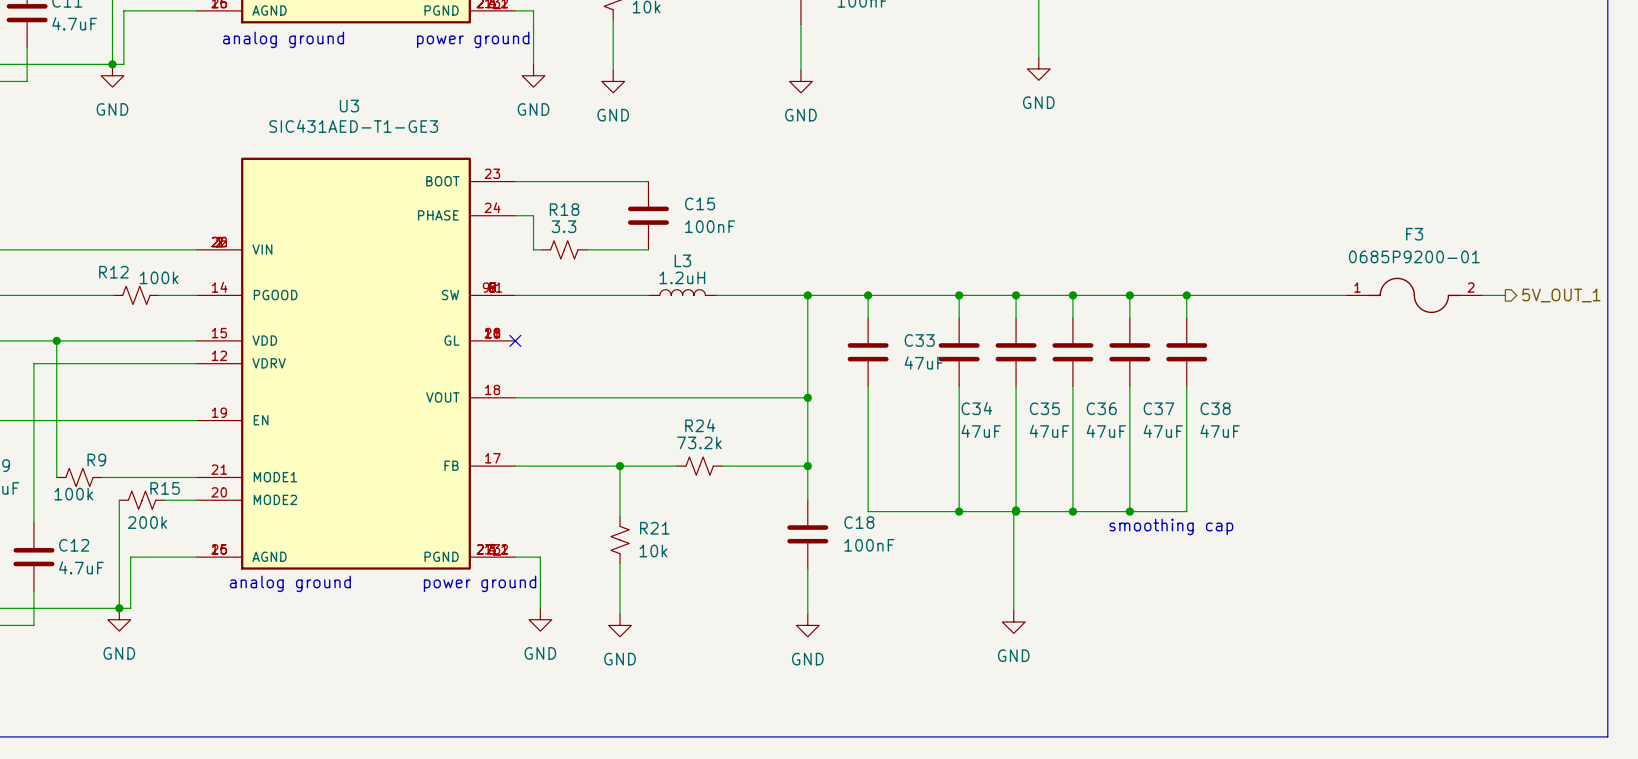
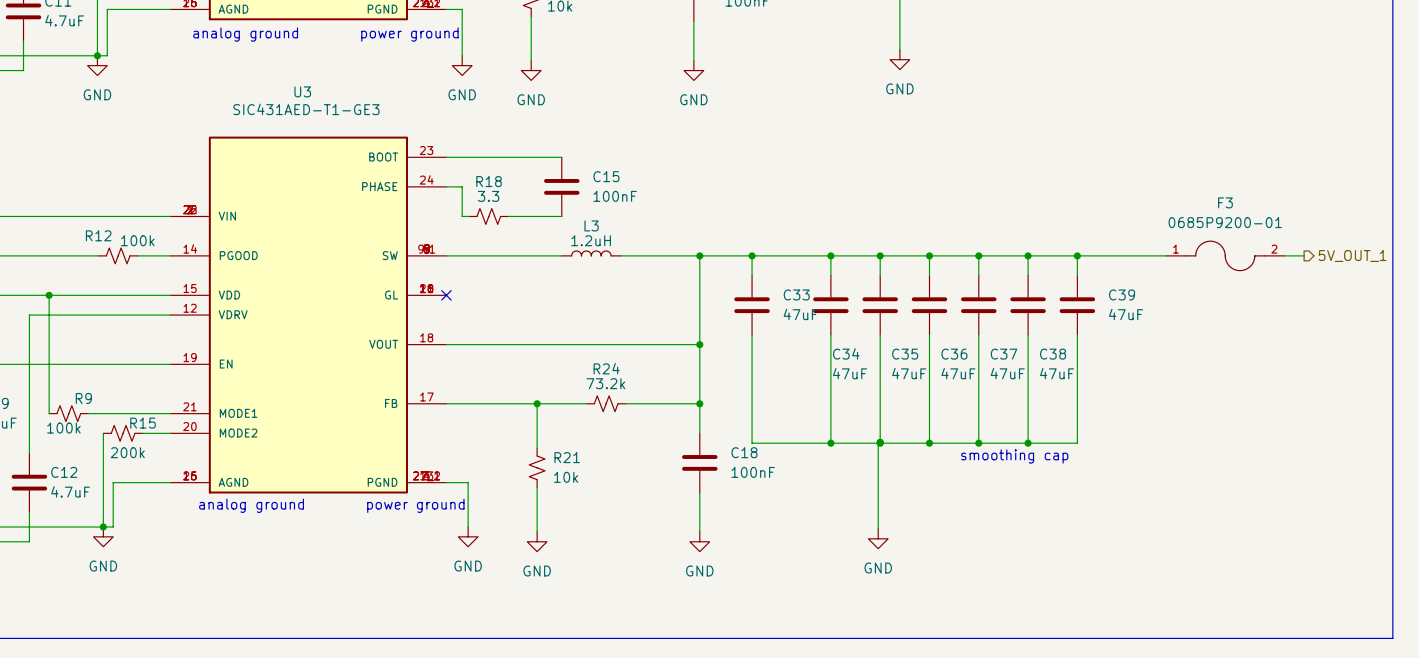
wire: none -> (1077, 255) (1077, 275)
junction: none -> (1077, 255)
C39: none -> 47uF (1077, 305)
wire: none -> (1077, 334) (1077, 443) (1028, 443)
junction: none -> (1028, 443)

